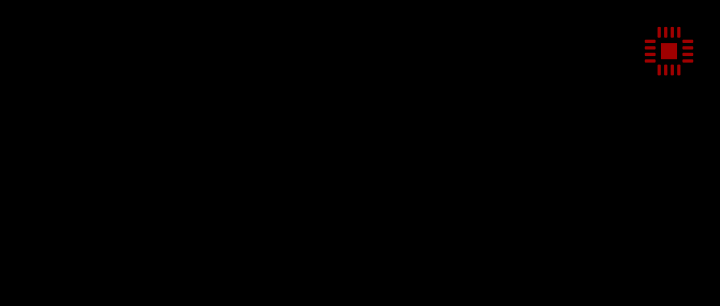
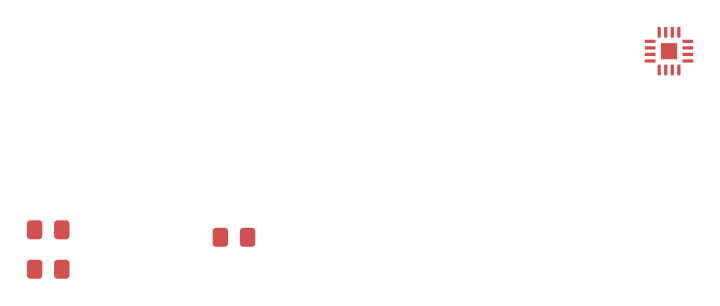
part: none -> (48, 229)
part: none -> (233, 237)
part: none -> (48, 269)

